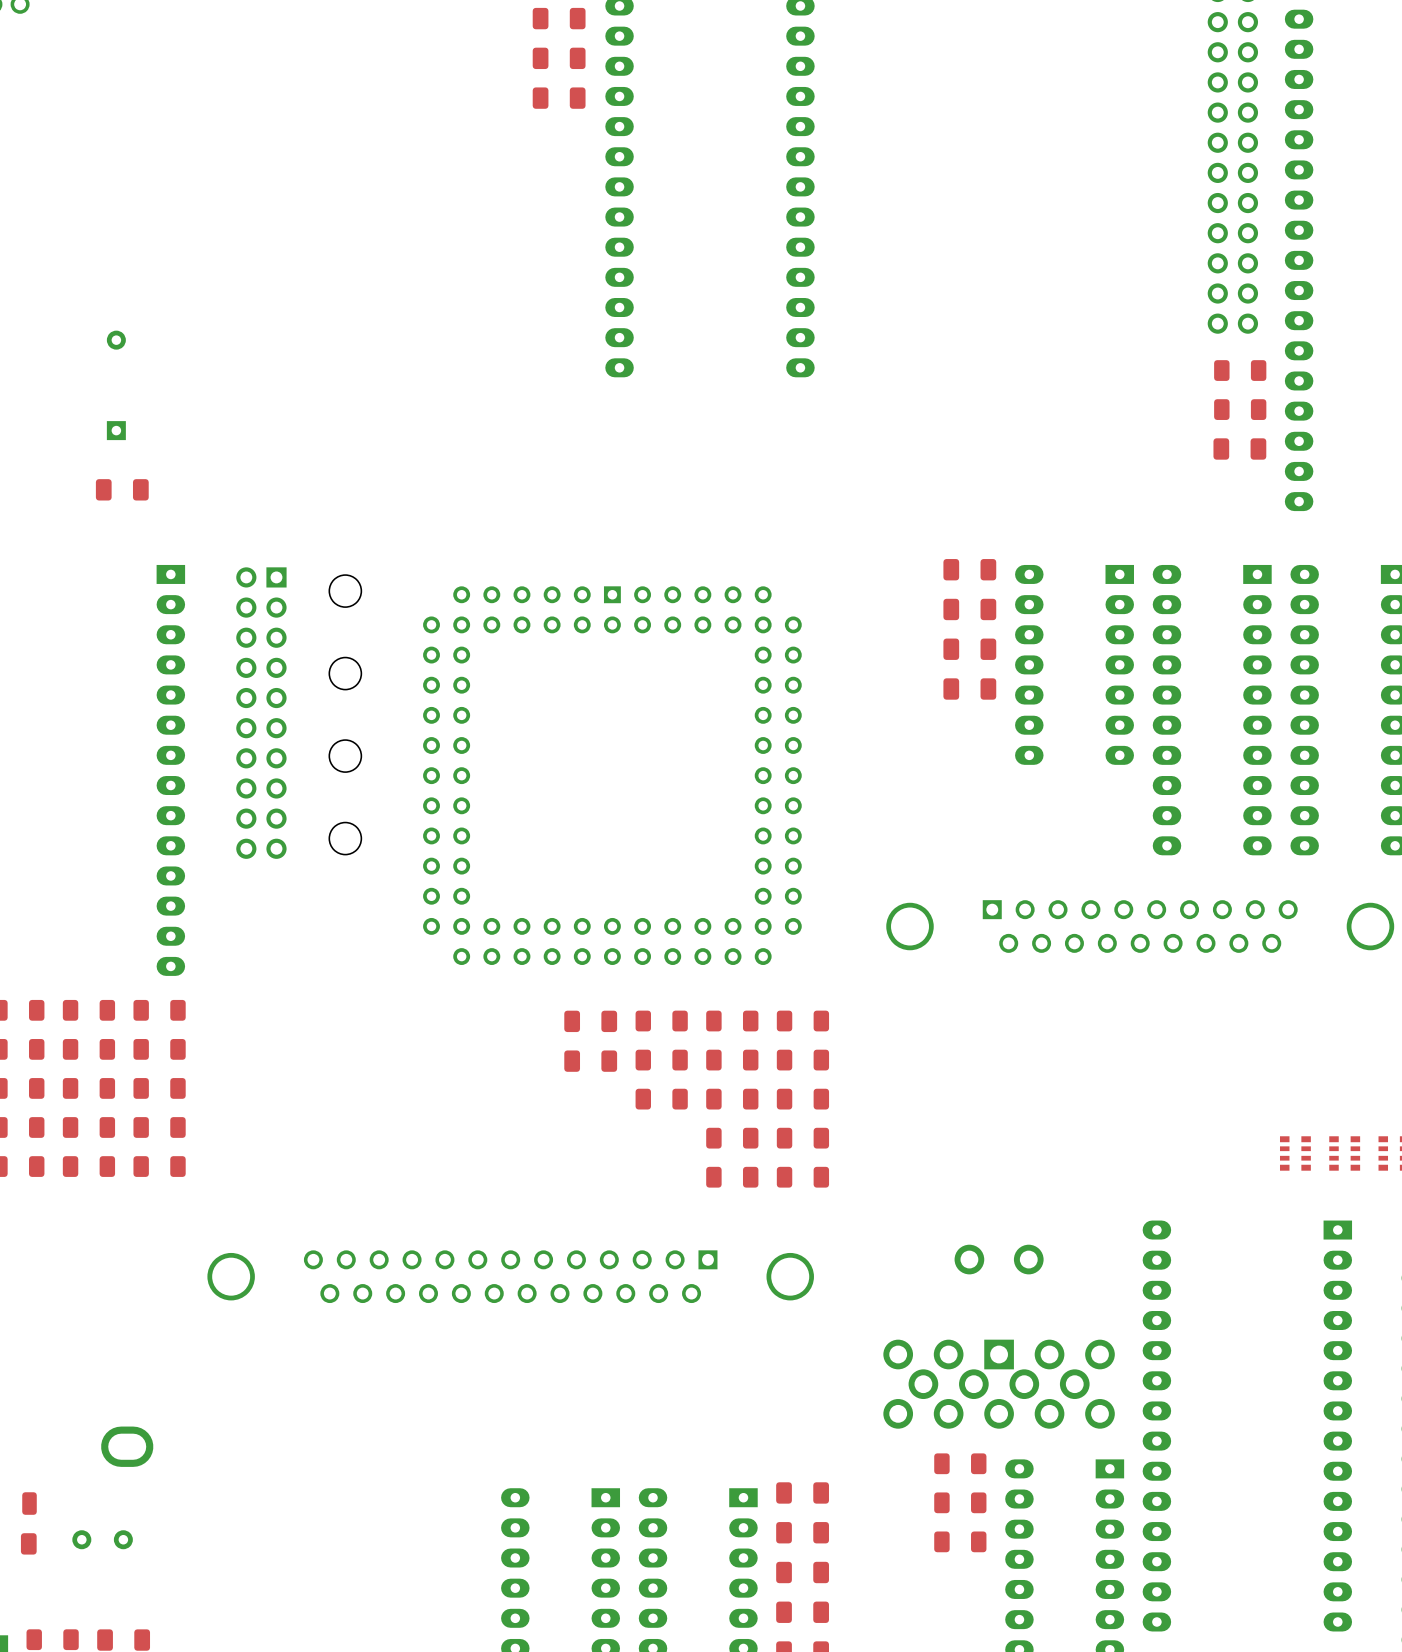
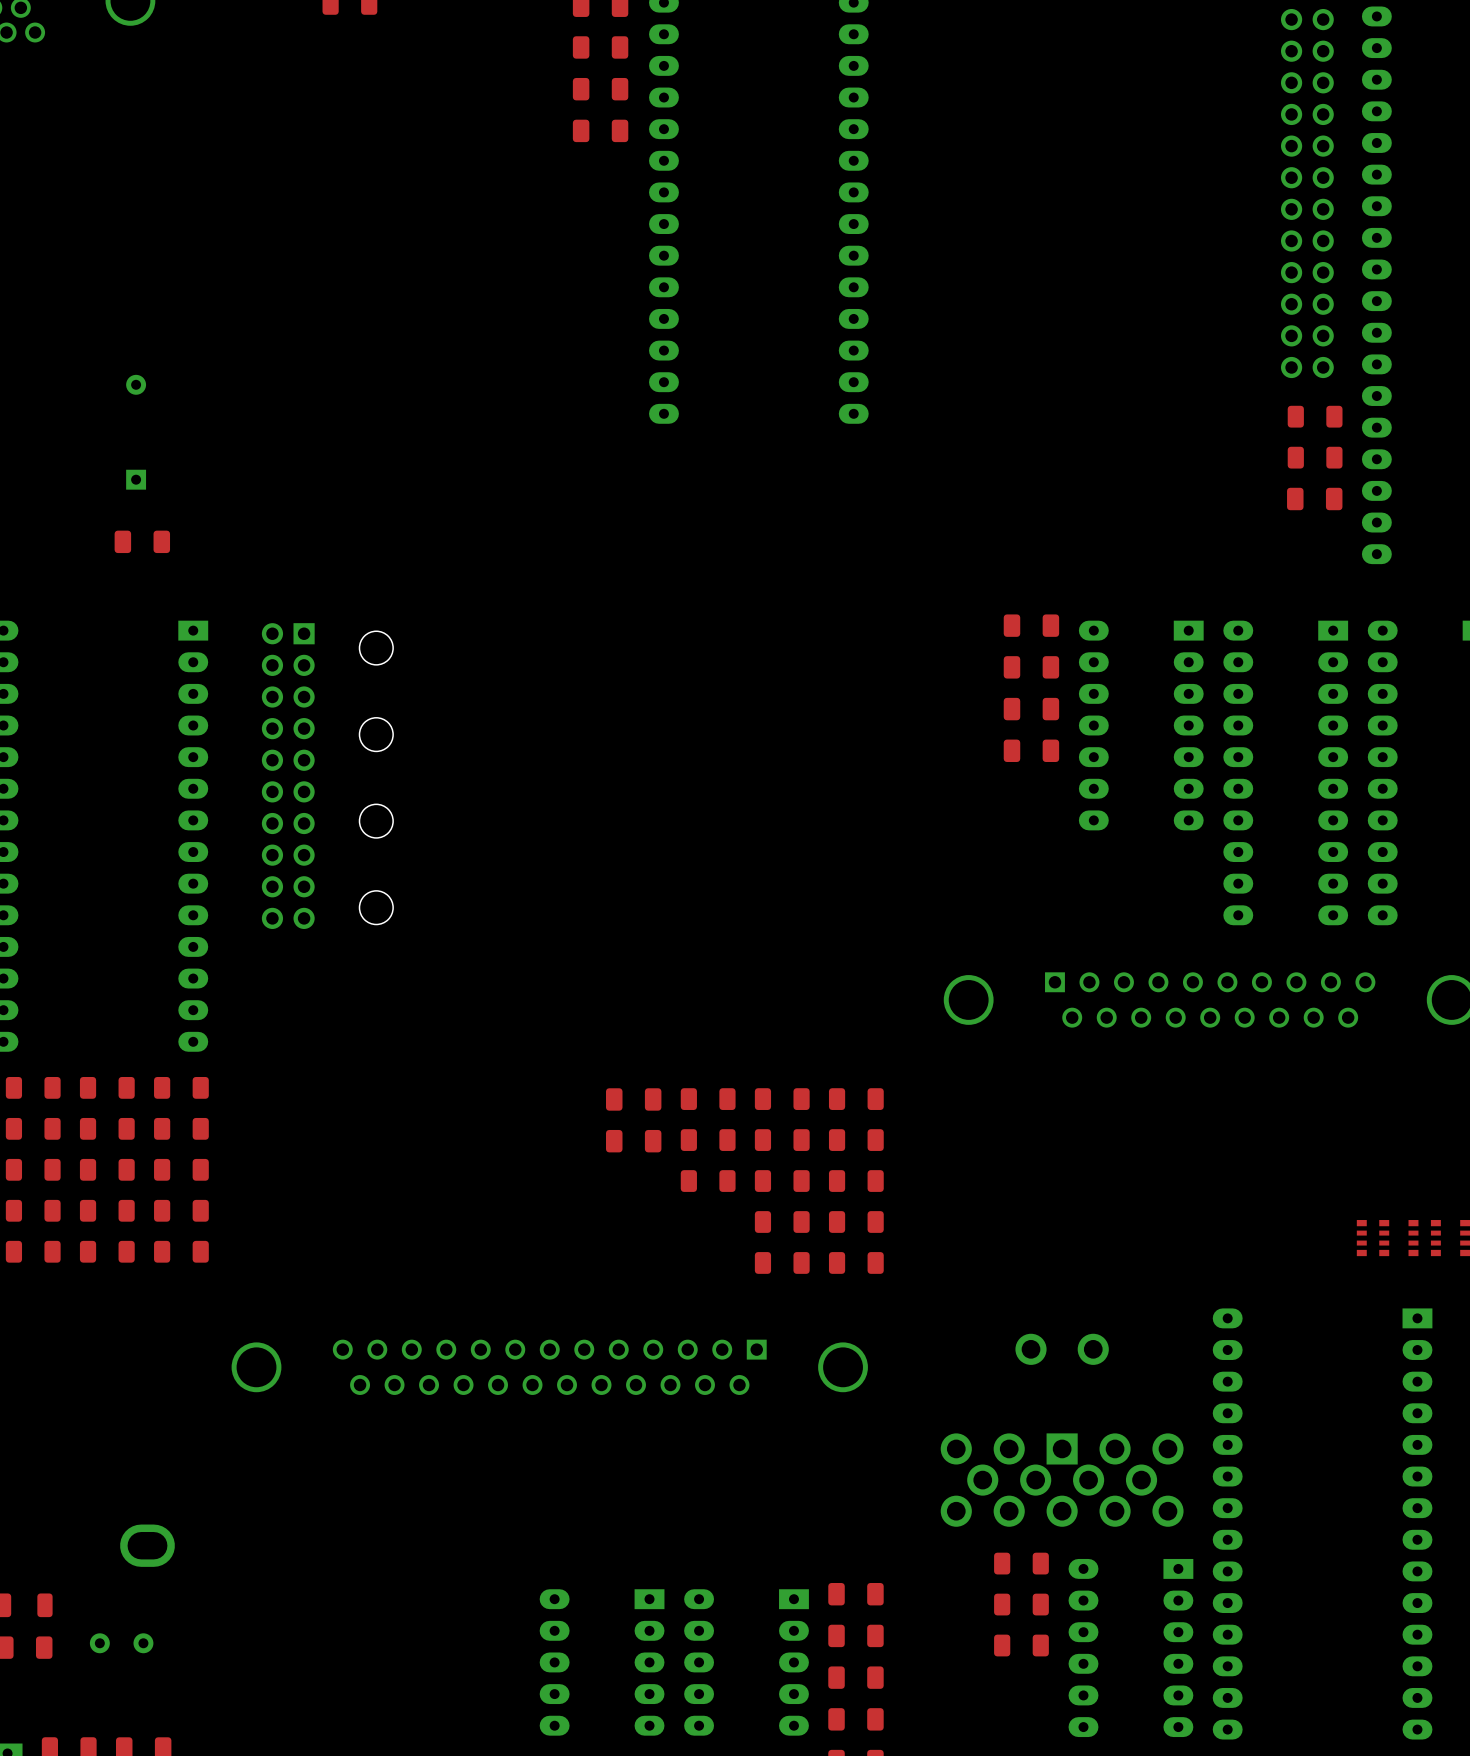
part: (612, 775) -> none

